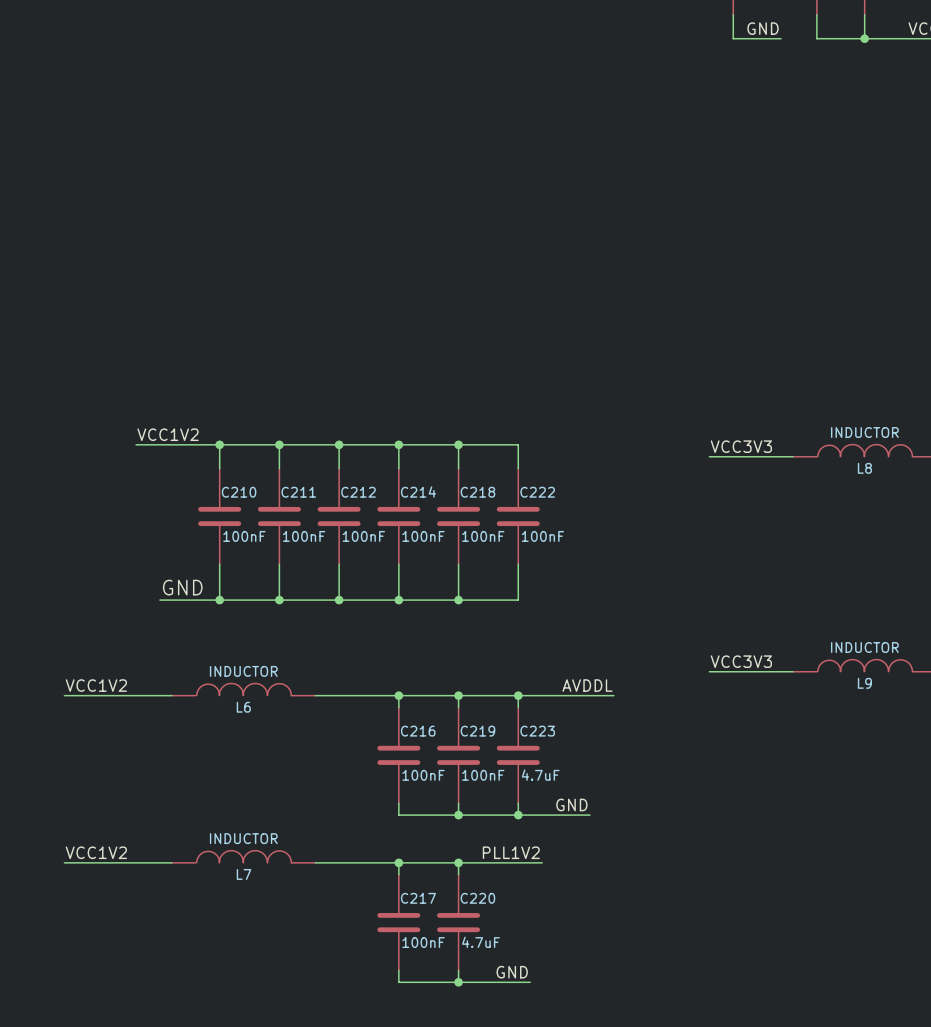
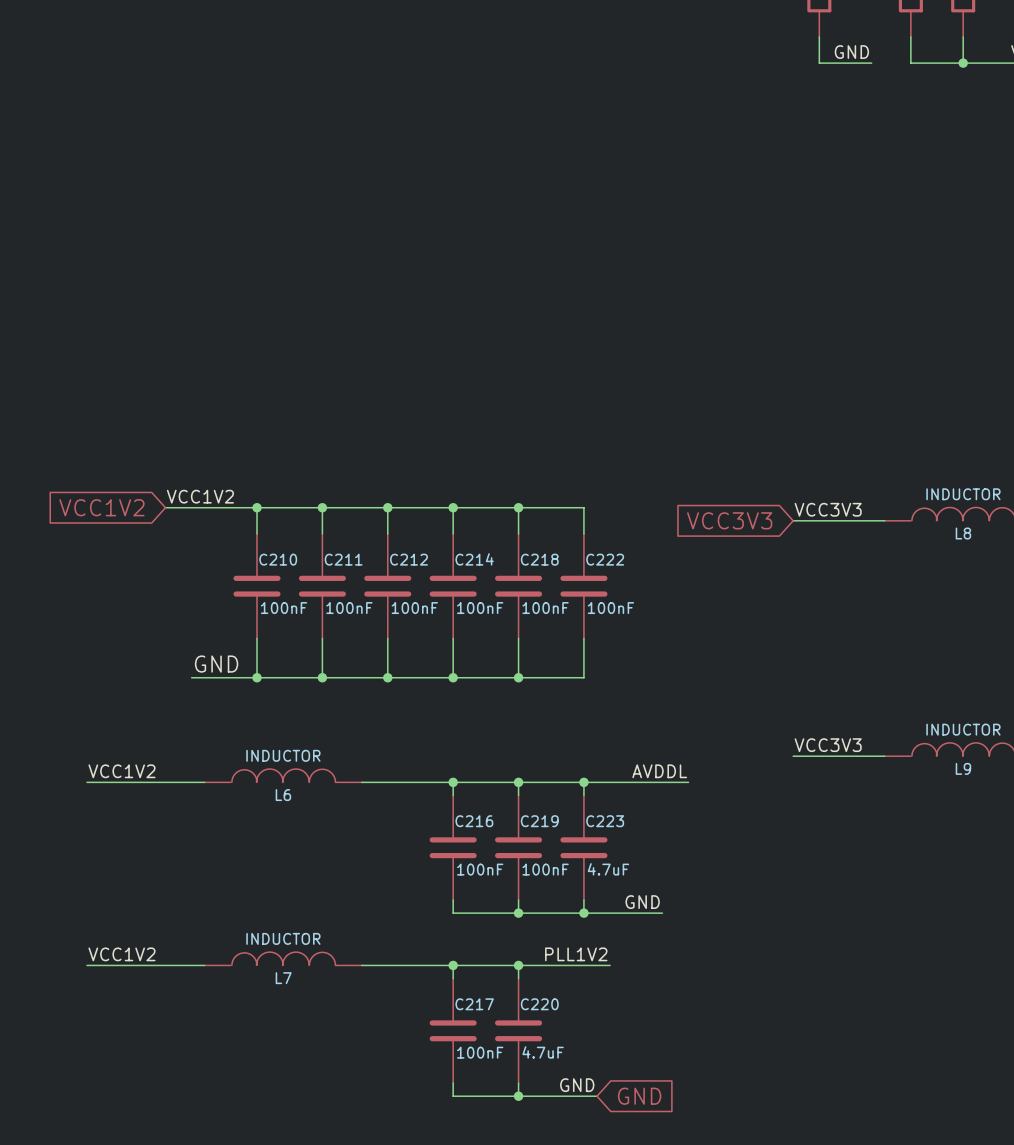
global label: none -> VCC1V2 (101, 507)
global label: none -> VCC3V3 (729, 520)
global label: none -> GND (639, 1096)

